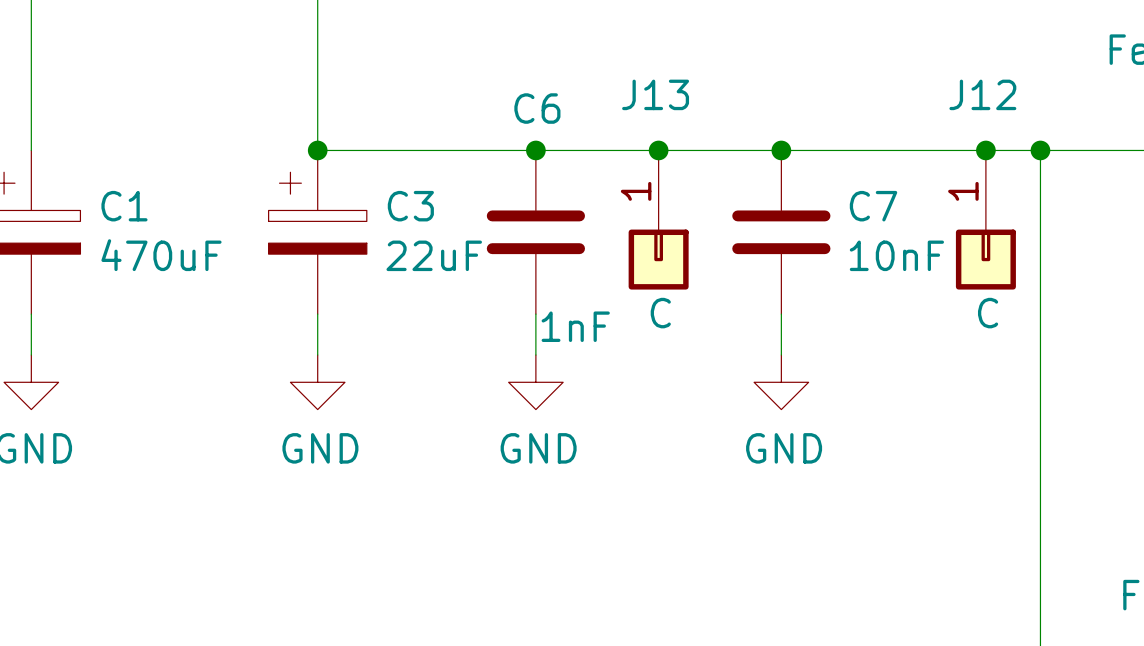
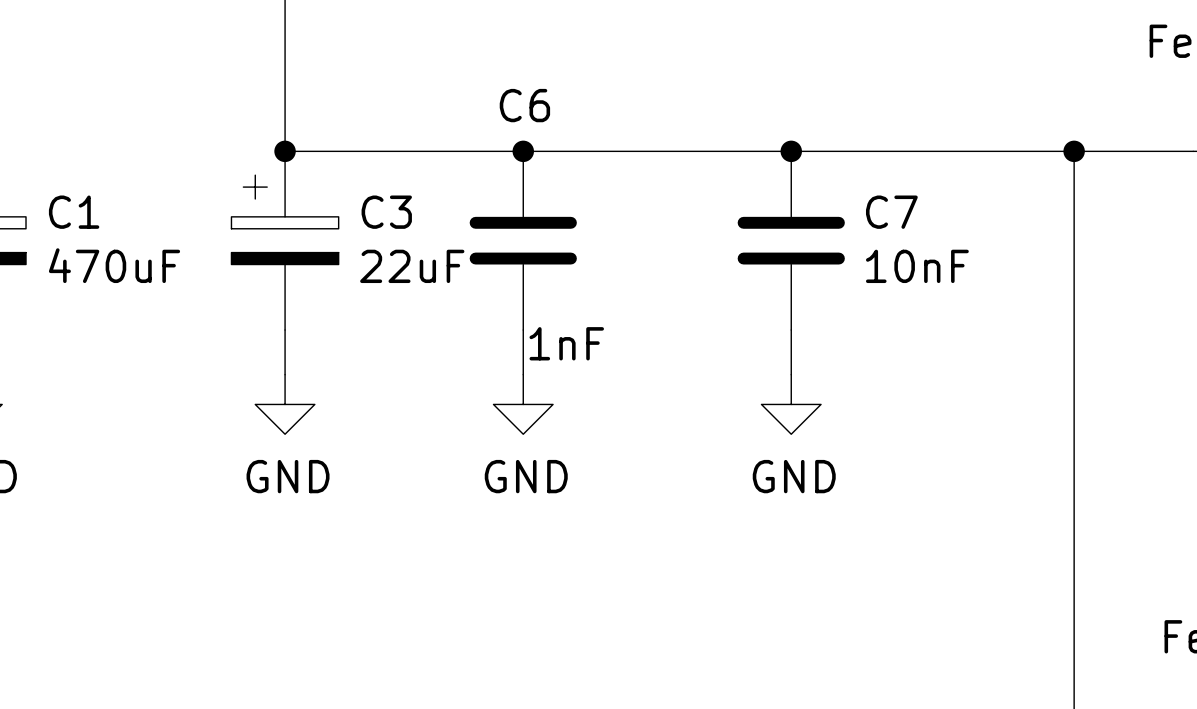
junction: (658, 150) -> none
junction: (985, 150) -> none
J13: C (658, 220) -> none
J12: C (985, 220) -> none

